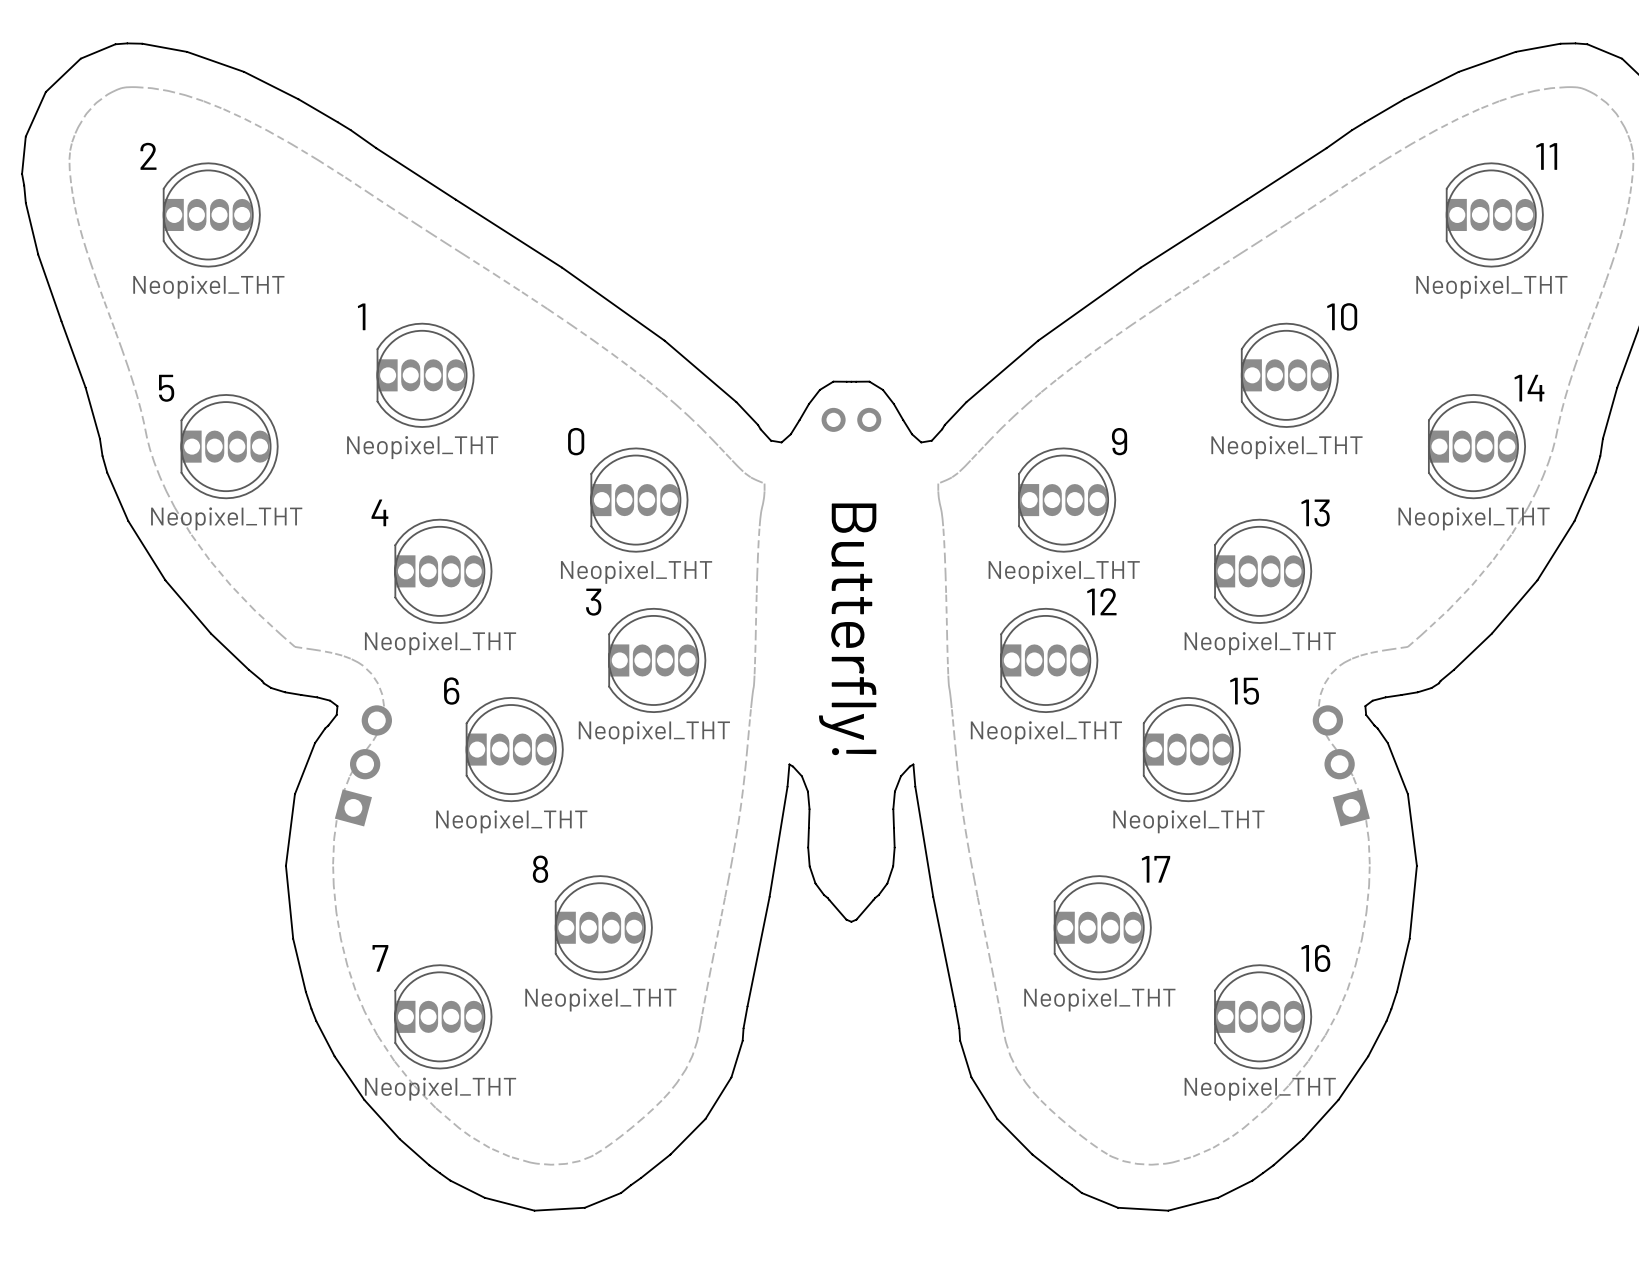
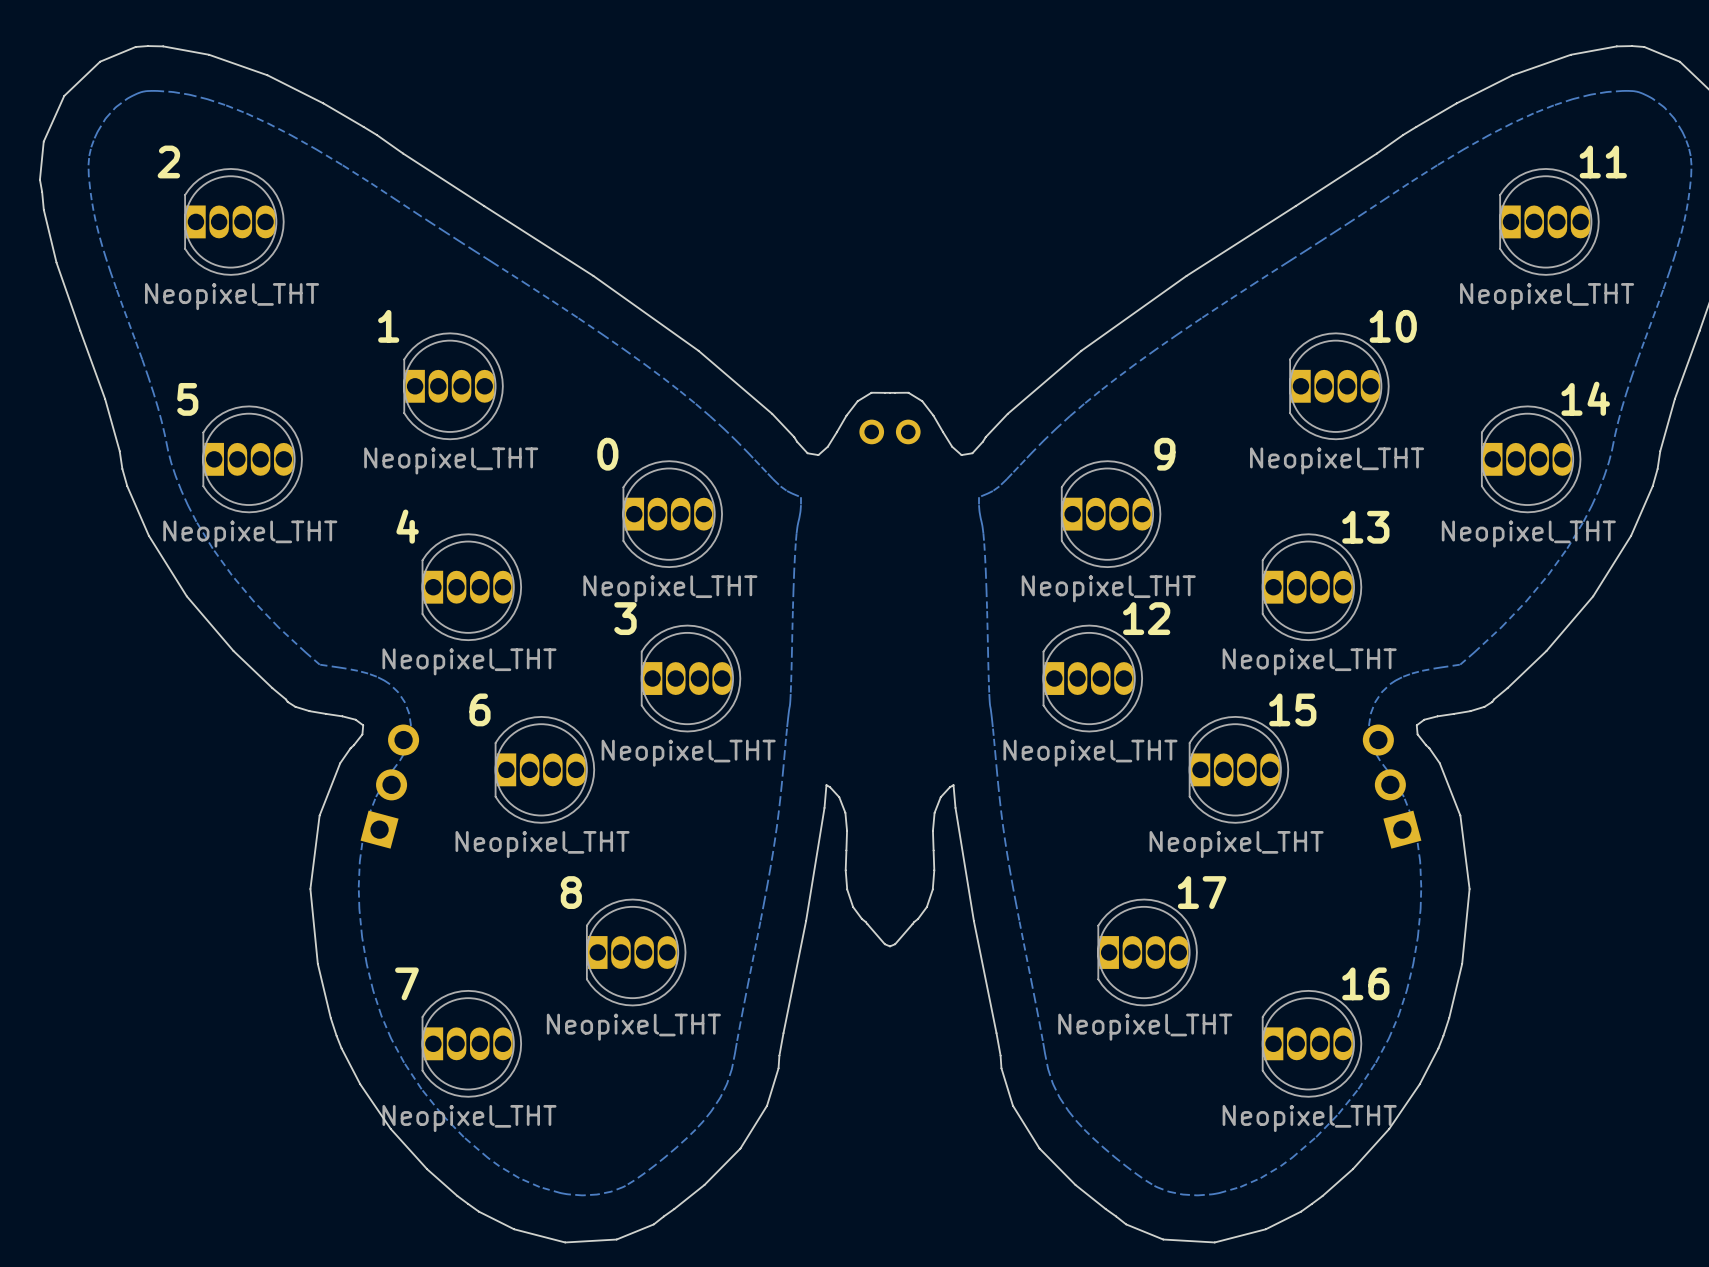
text: Butterfly! (847, 629) -> none

